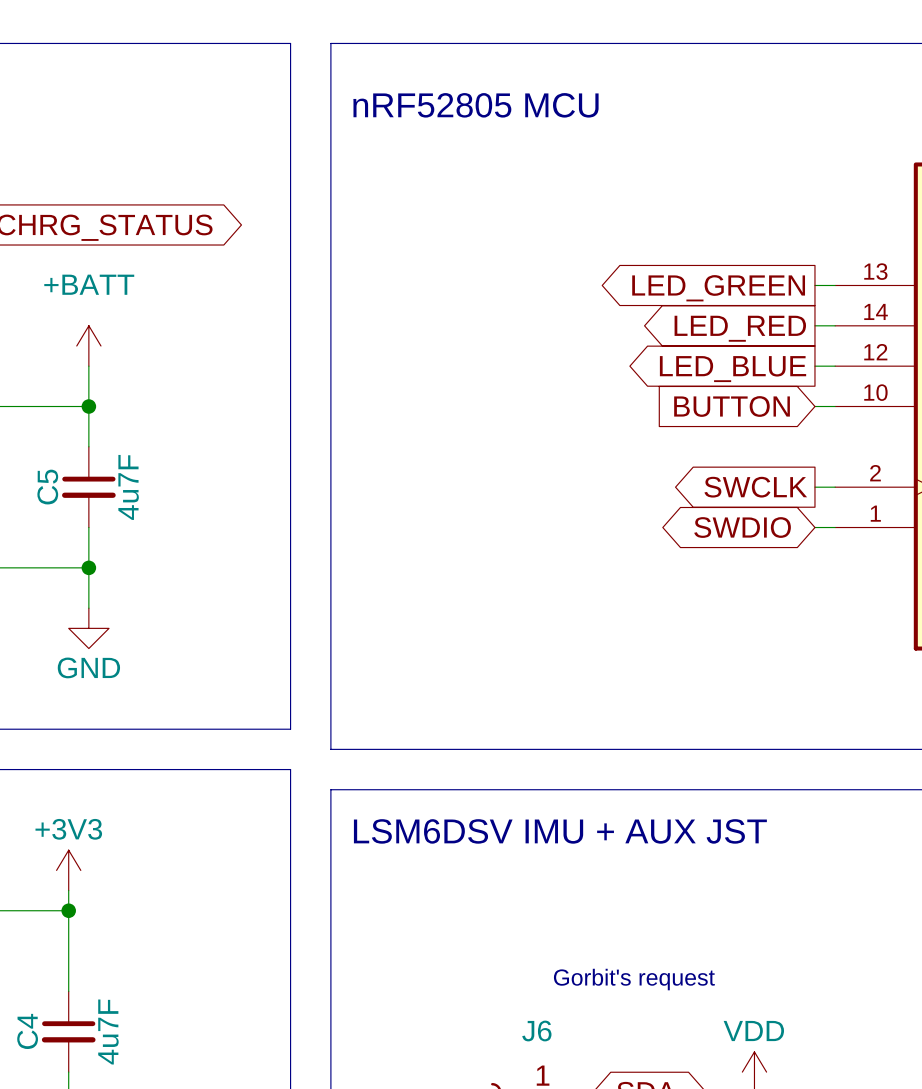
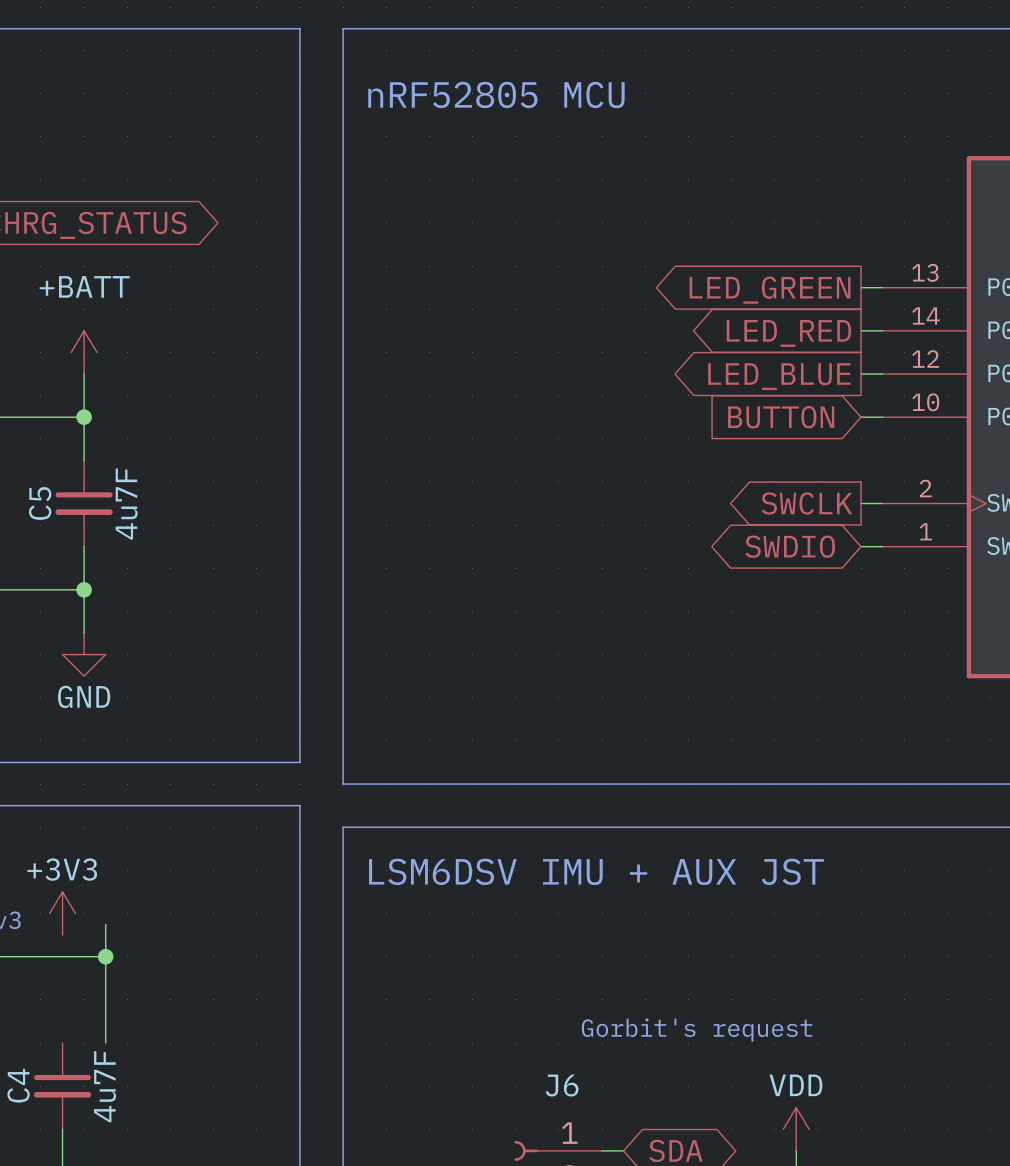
wire: none -> (105, 924) (105, 1043)
wire: (68, 890) (68, 991) -> none
wire: none -> (62, 956) (105, 956)
junction position: (68, 910) -> (105, 956)

